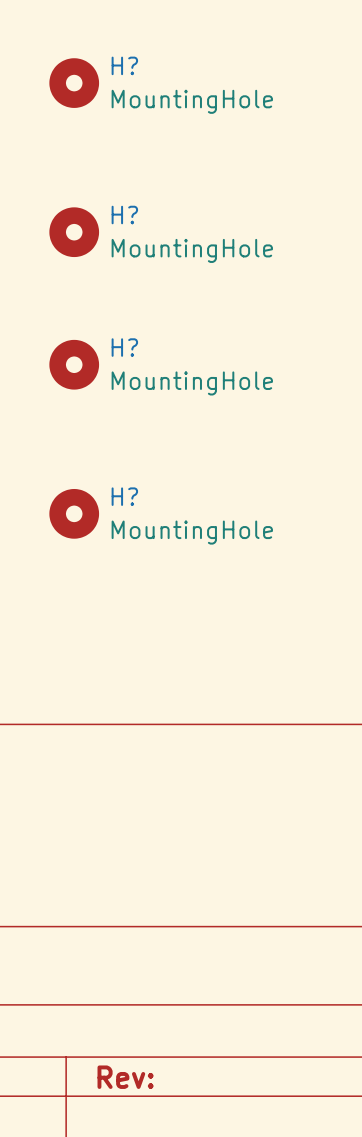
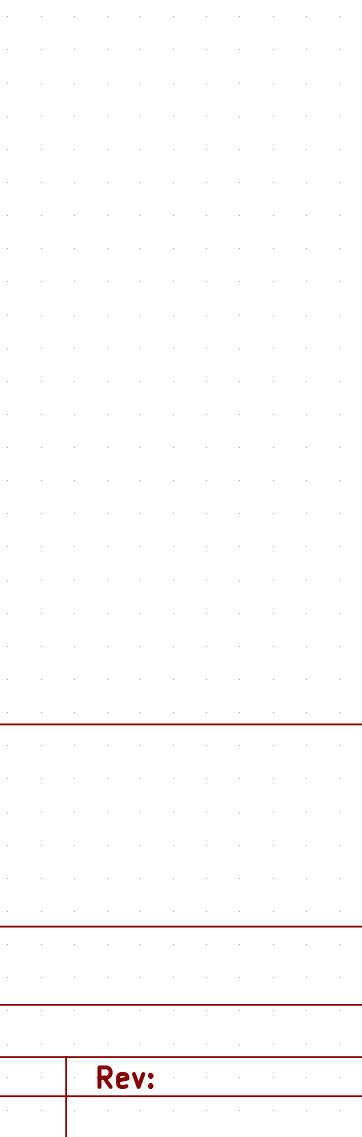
H?: MountingHole (74, 83) -> none
H?: MountingHole (74, 232) -> none
H?: MountingHole (74, 364) -> none
H?: MountingHole (74, 513) -> none

